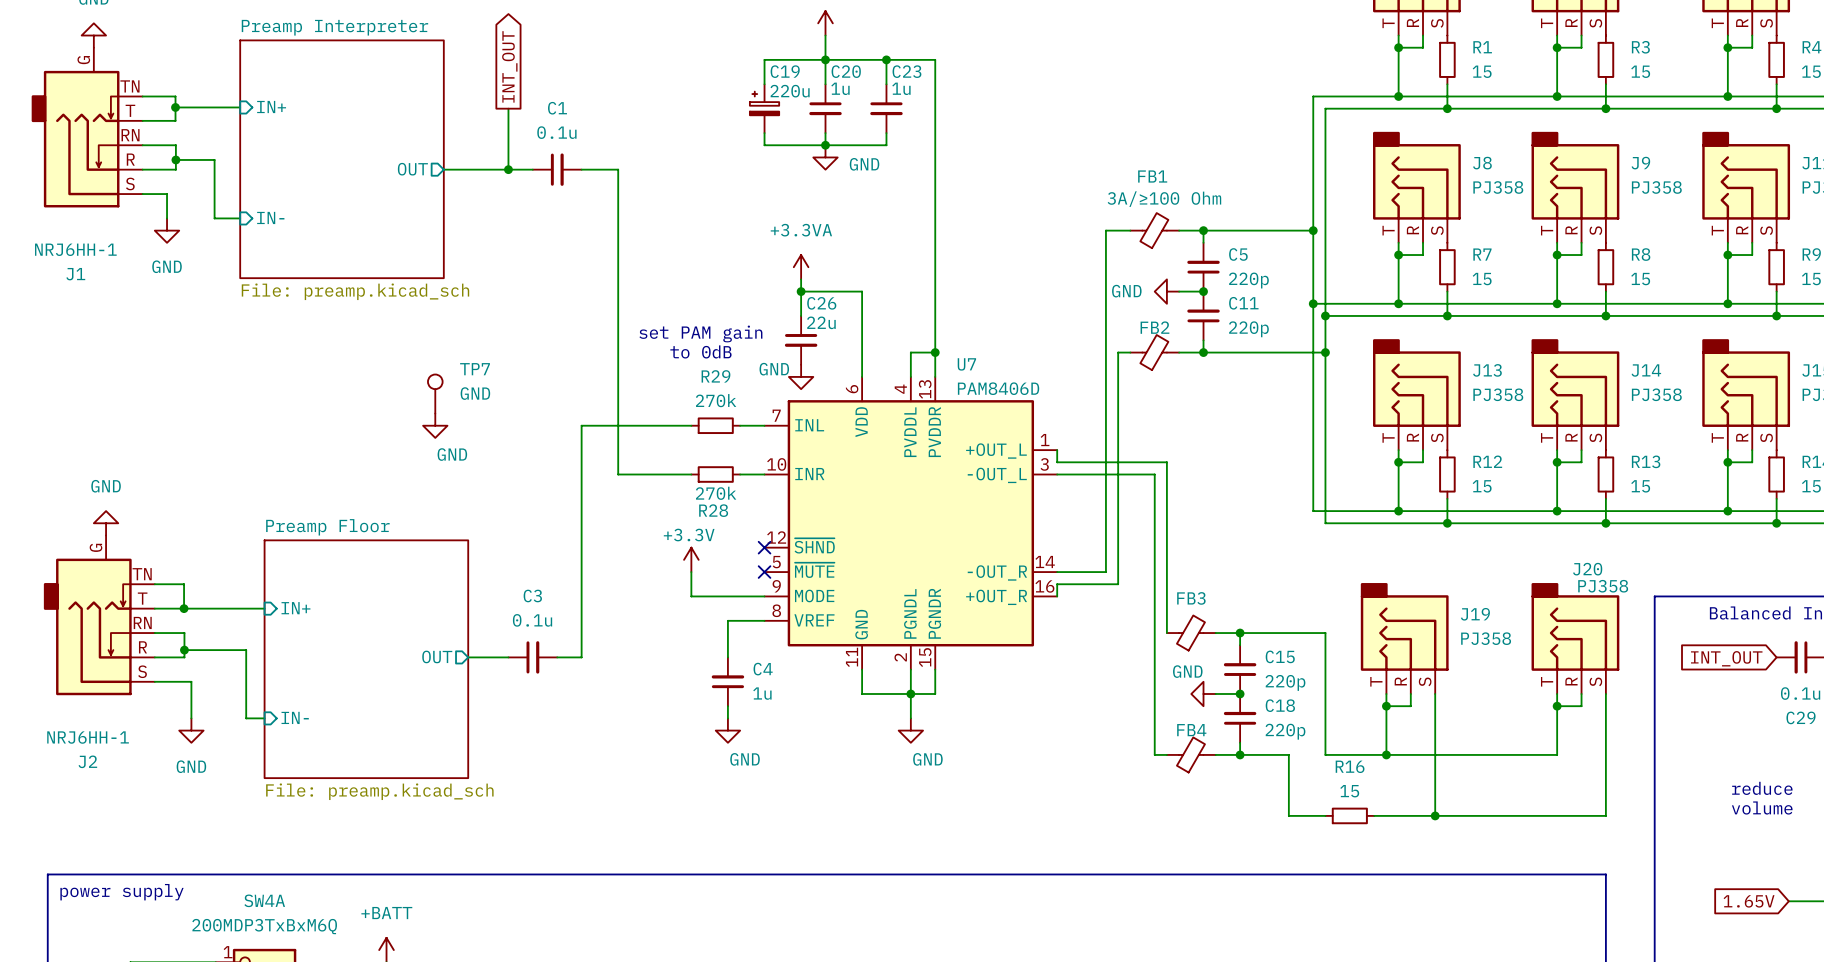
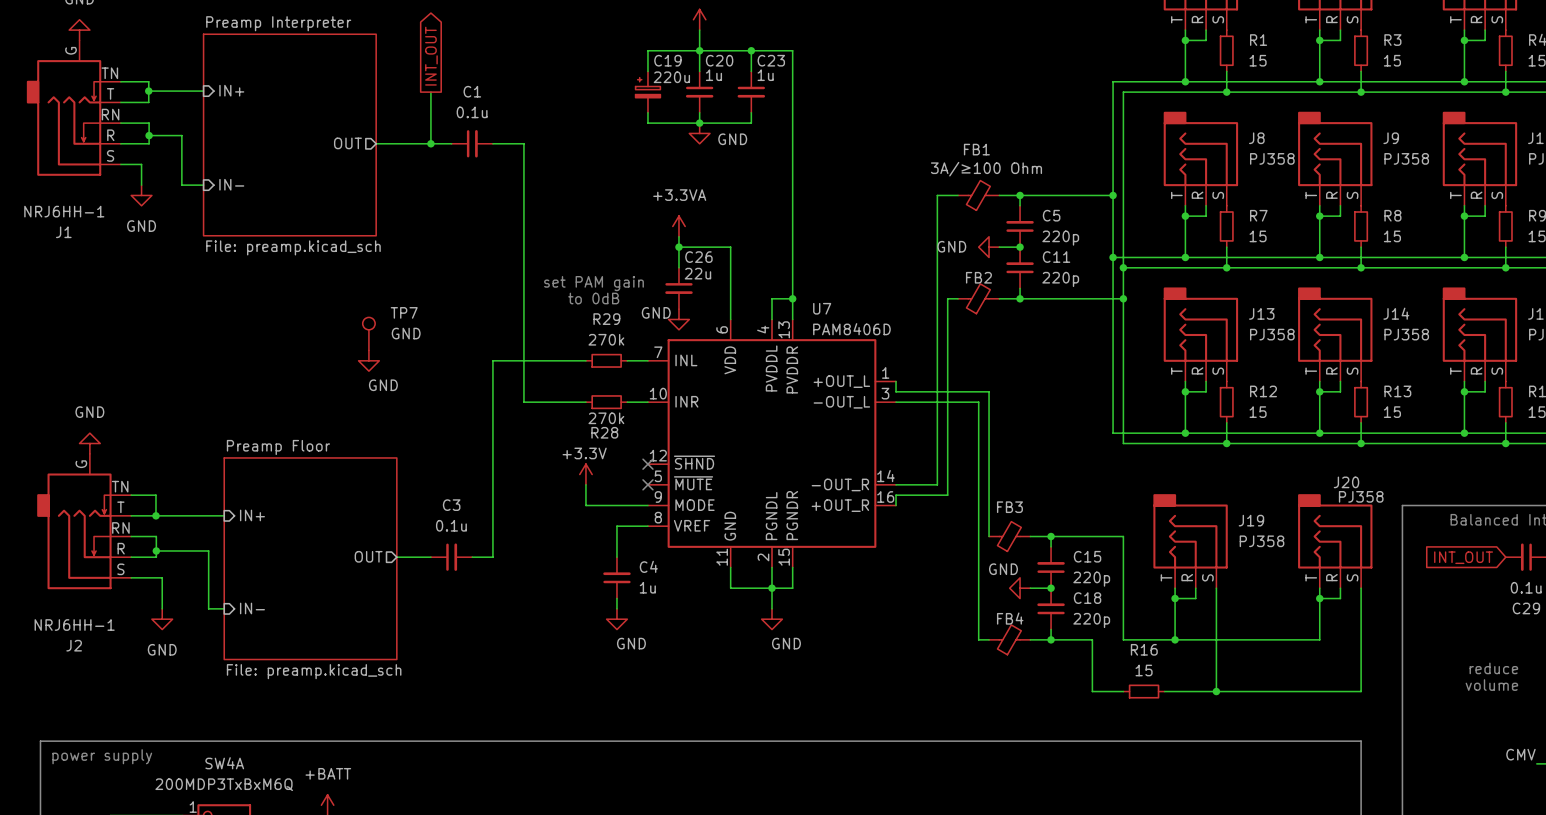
label: none -> CMV (1520, 754)
global label: 1.65V (1749, 901) -> none
wire: (1788, 901) (1813, 901) -> none

